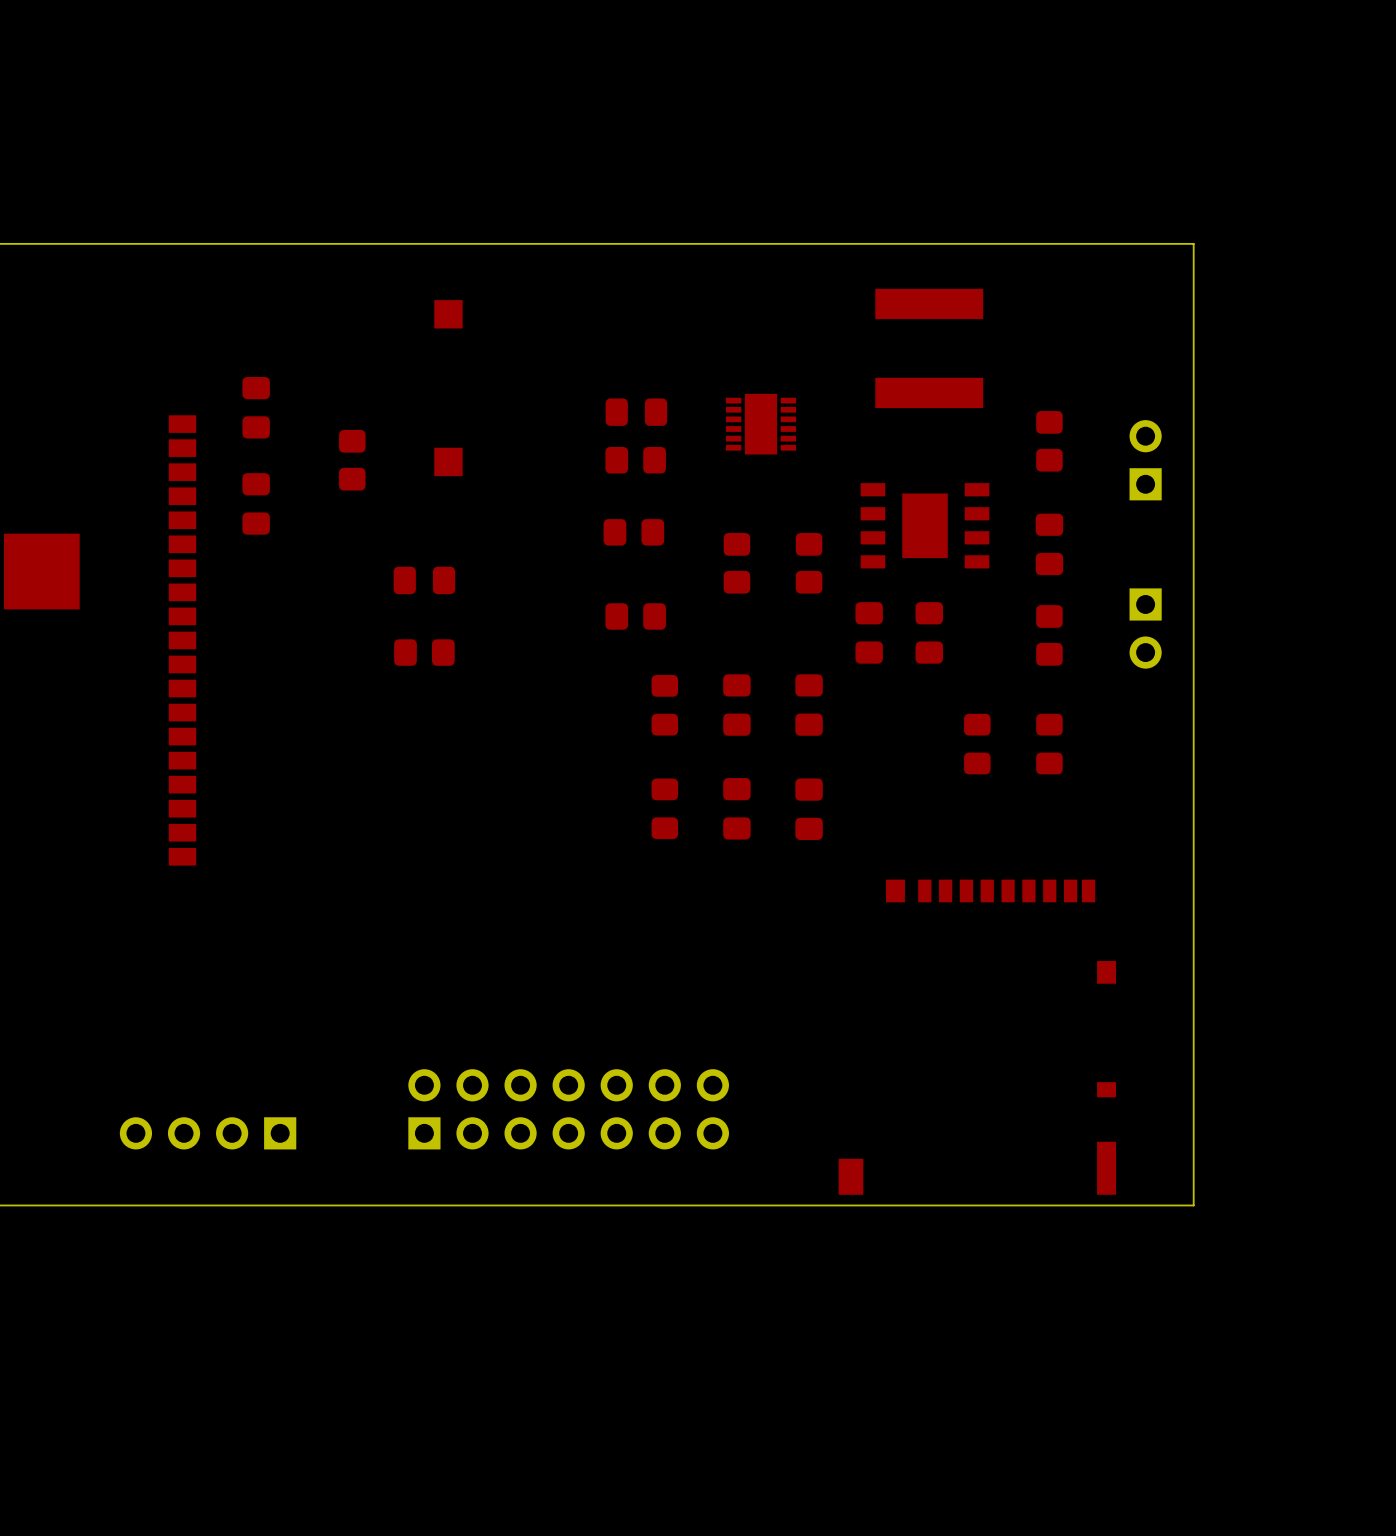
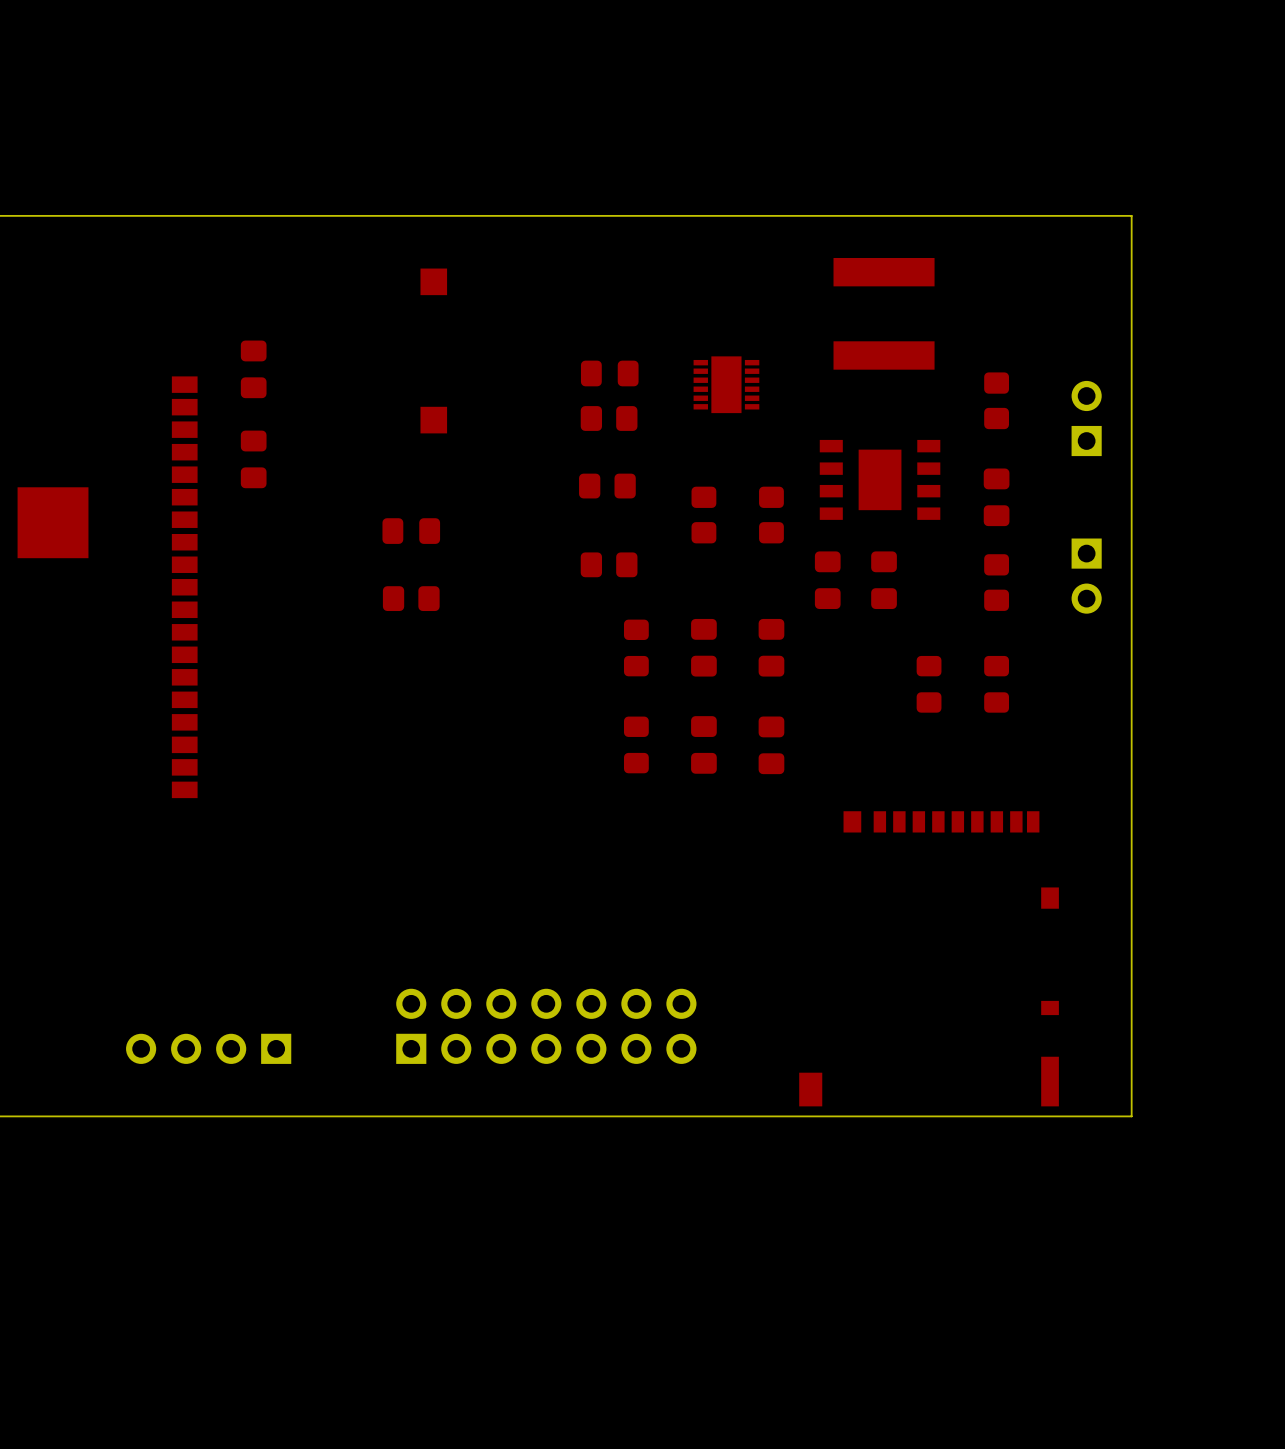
part: (352, 460) -> none

